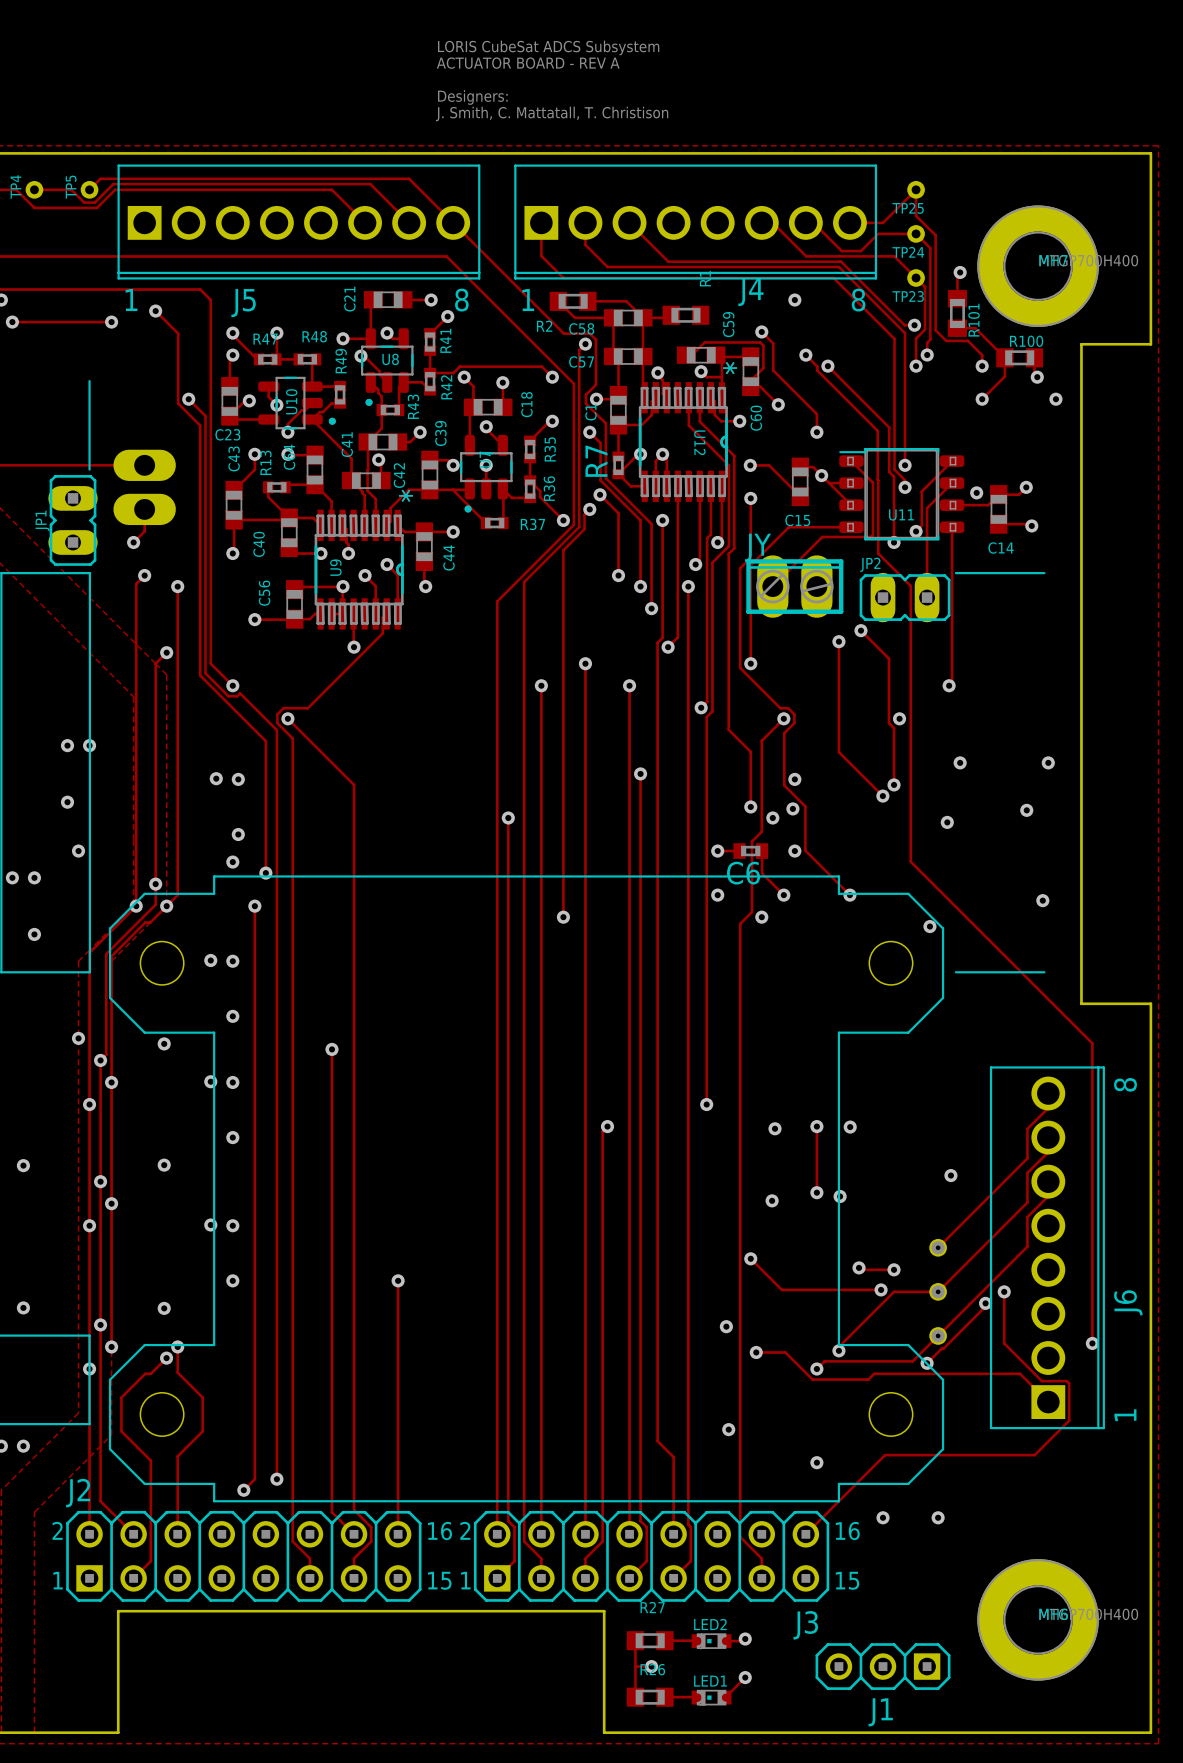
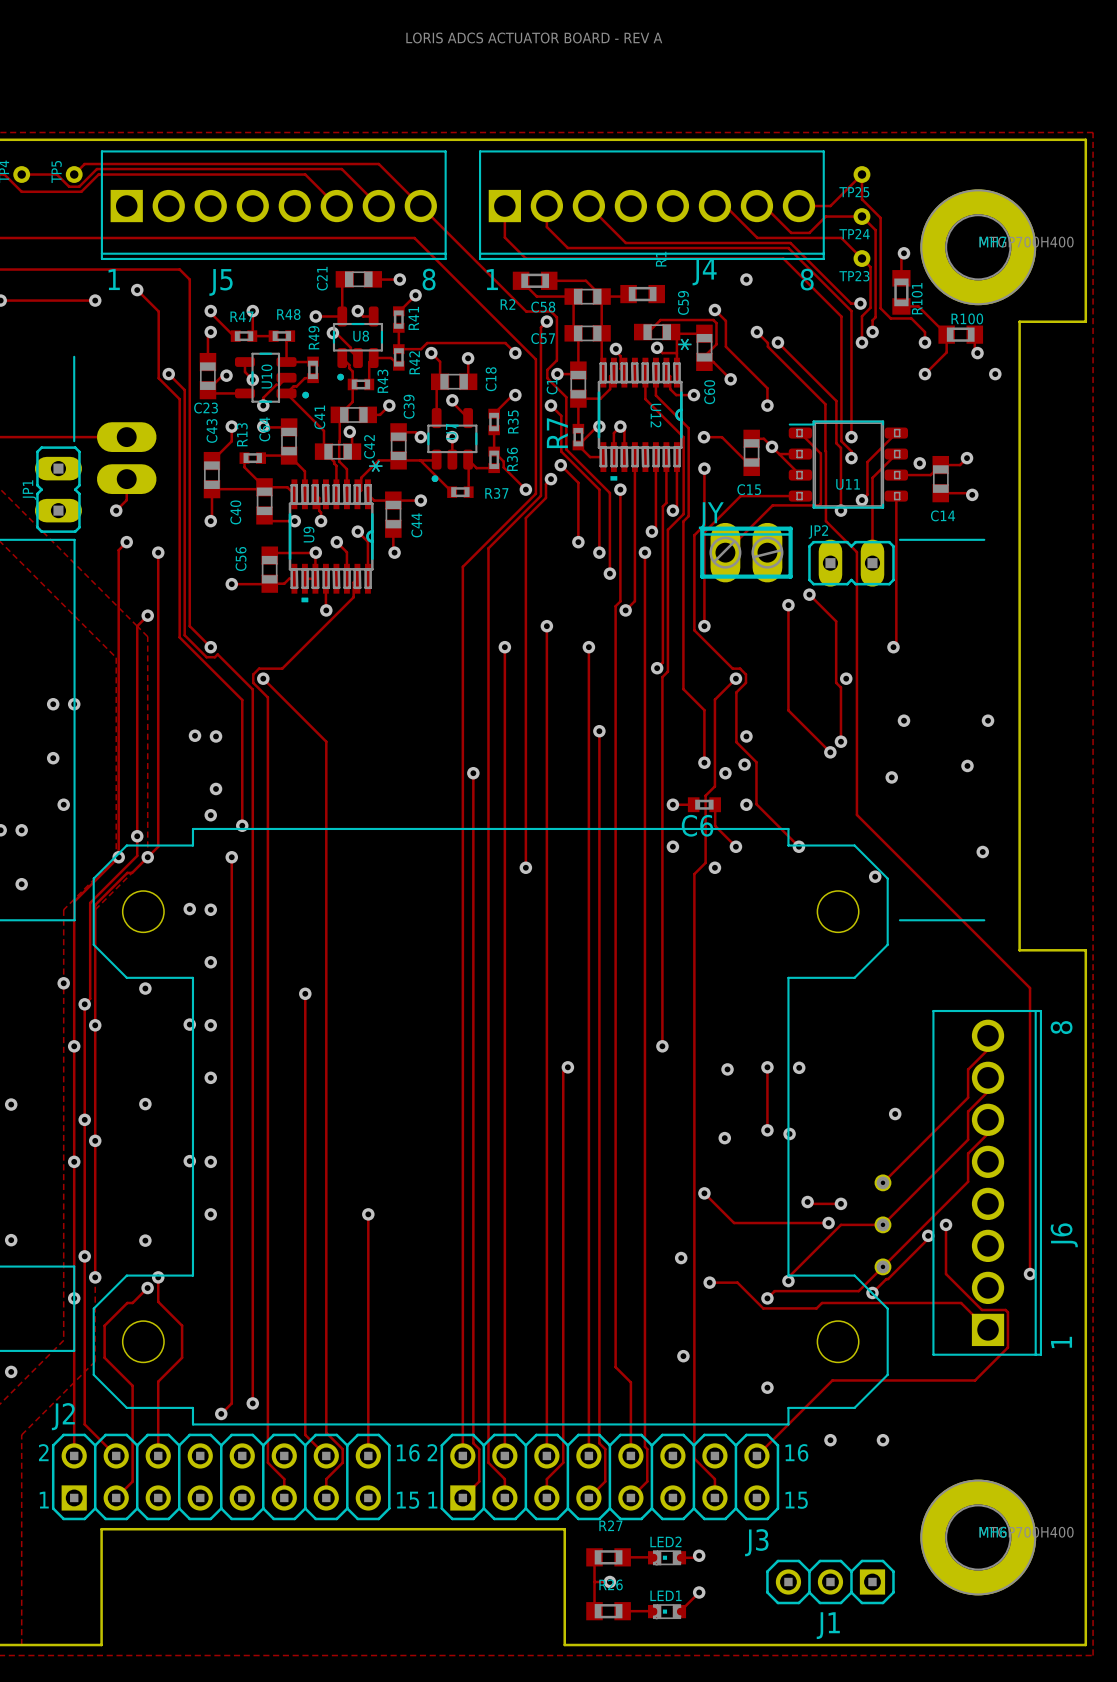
text: LORIS CubeSat ADCS Subsystem (548, 47) -> LORIS ADCS ACTUATOR BOARD - REV A (534, 37)
text: ACTUATOR BOARD - REV A (528, 63) -> none
text: Designers: (472, 97) -> none
text: J. Smith, C. Mattatall, T. Christison (552, 113) -> none
U12 footprint: [638, 382, 729, 502] -> [597, 357, 684, 481]
U9 footprint: [314, 509, 405, 630] -> [288, 479, 375, 603]

